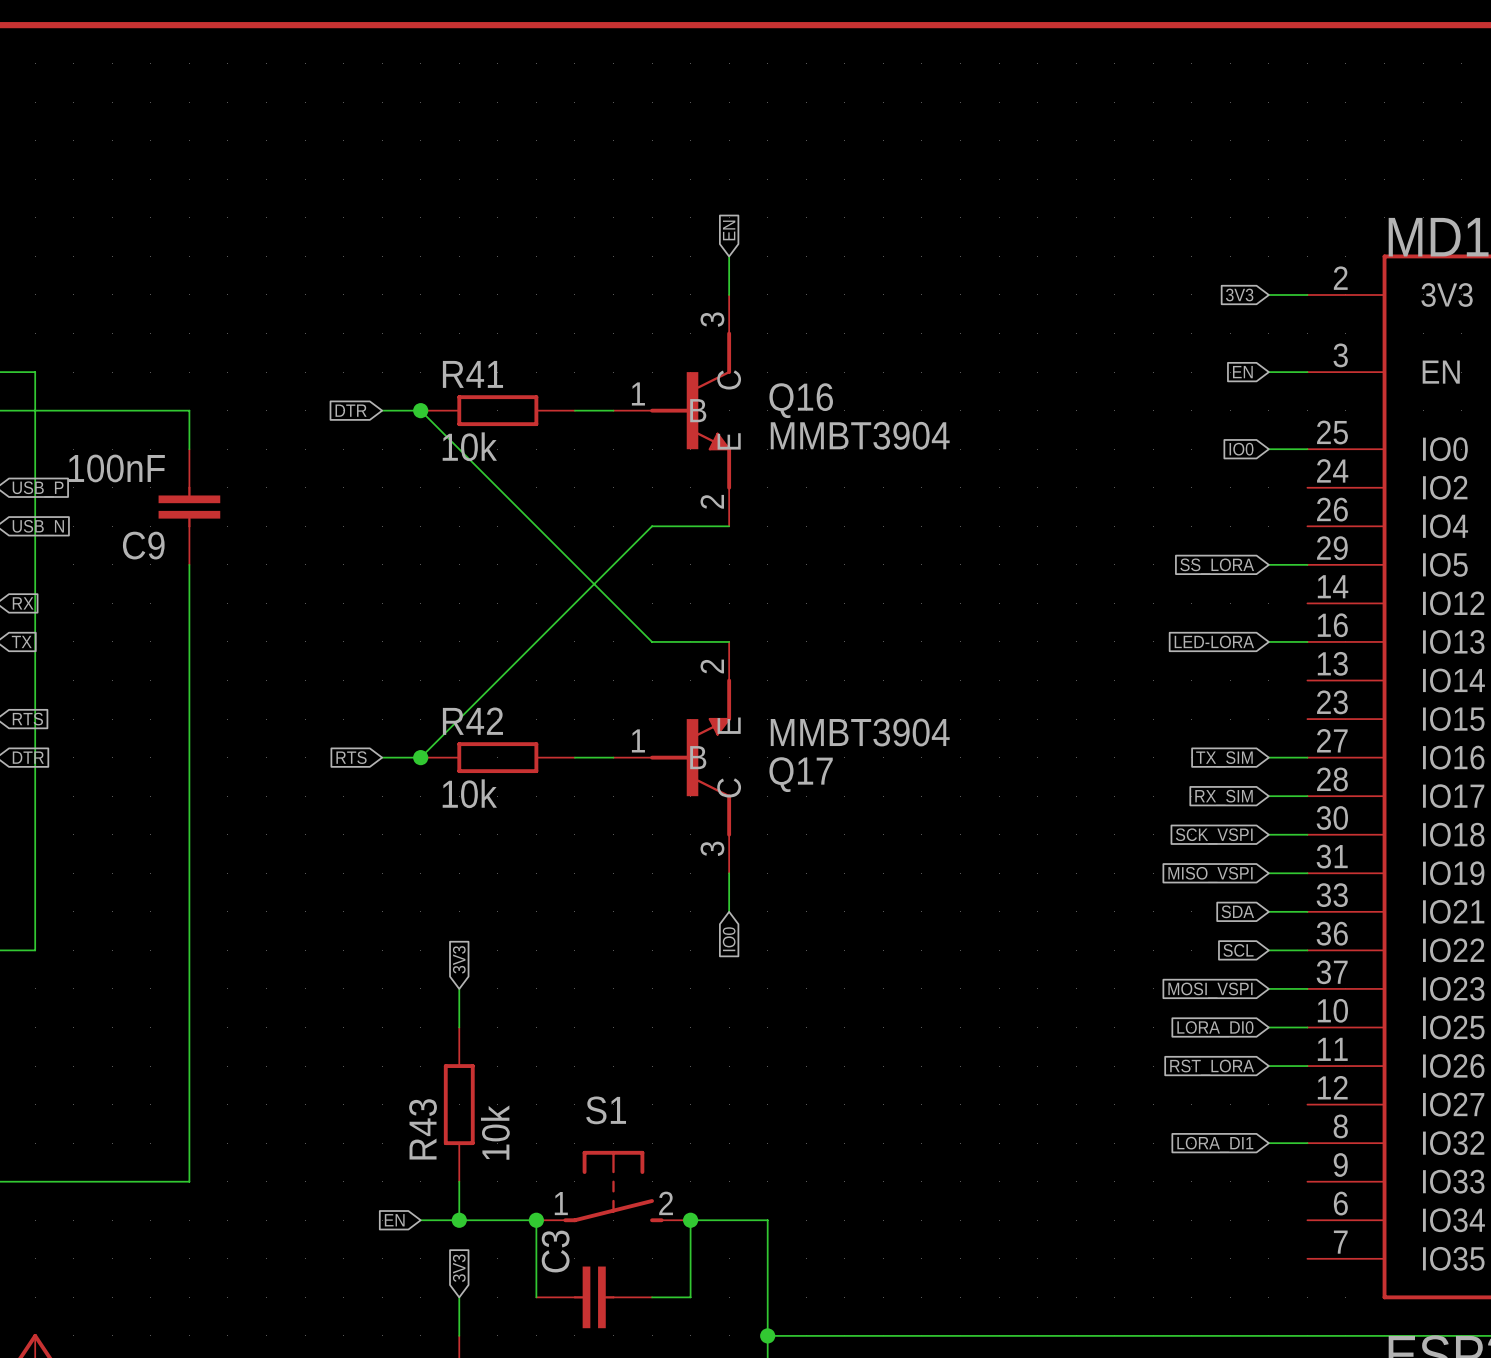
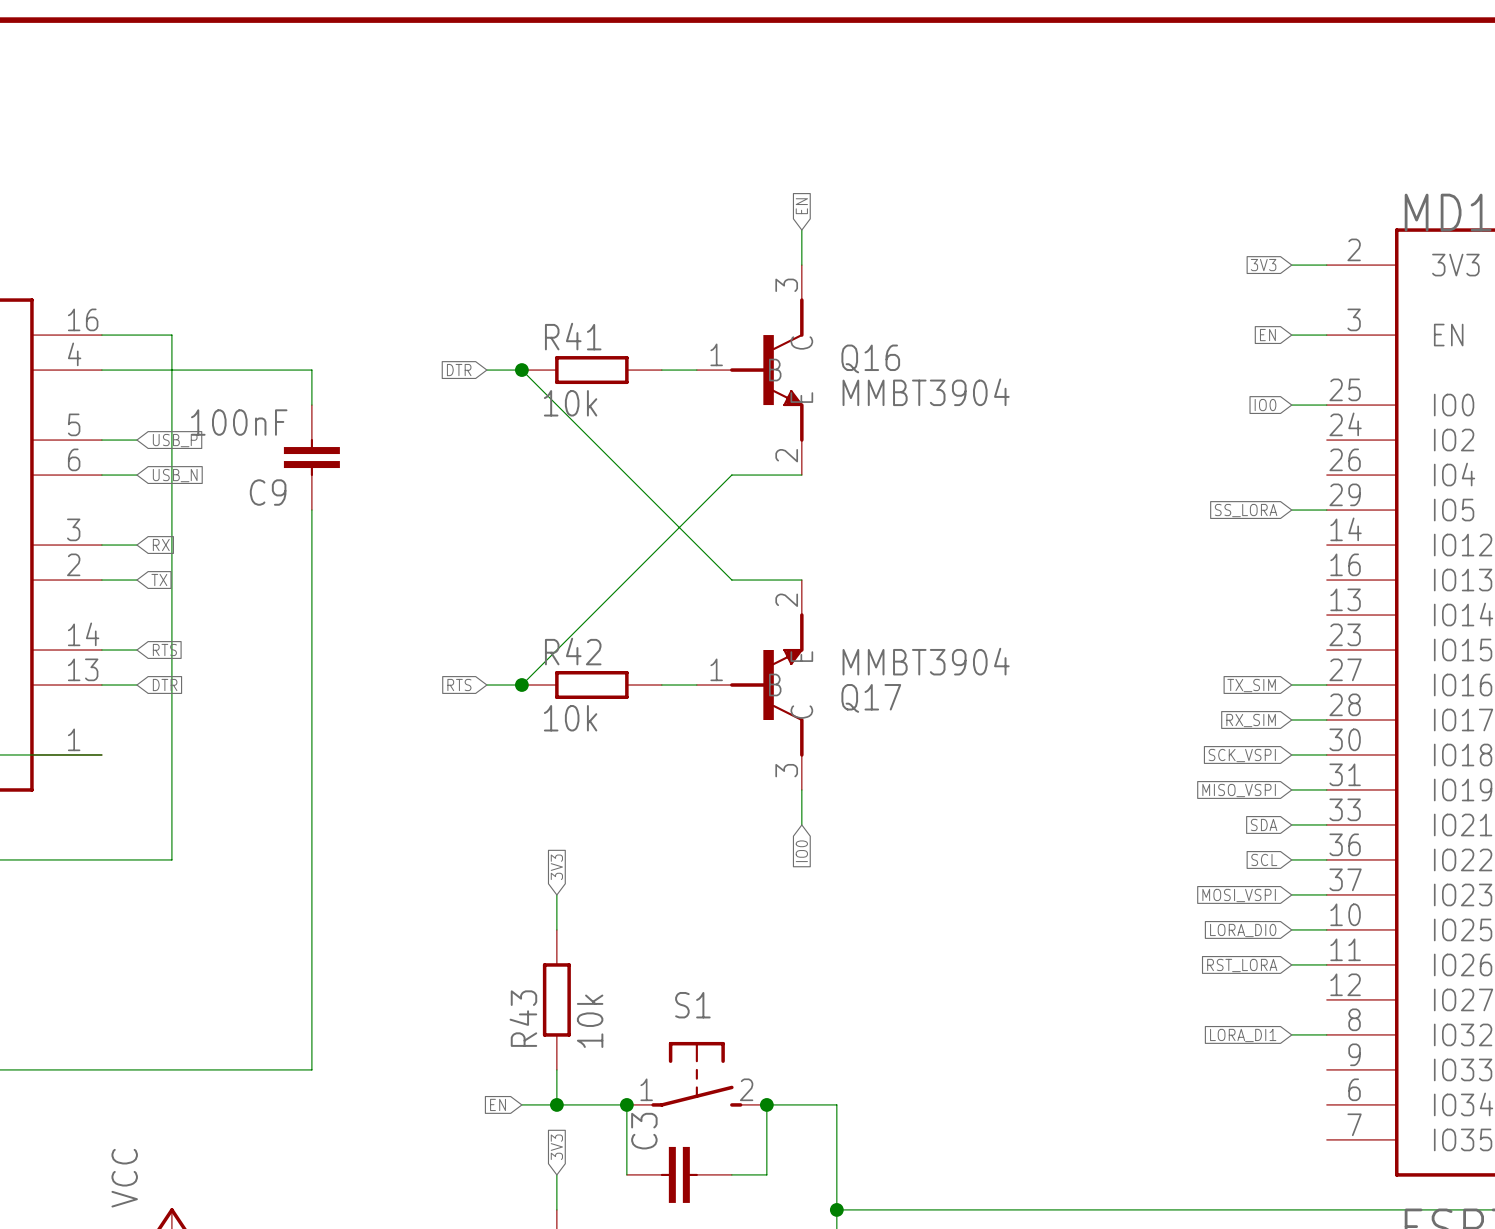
global label: LED-LORA (1214, 641) -> none
wire: (1268, 641) (1307, 641) -> none

